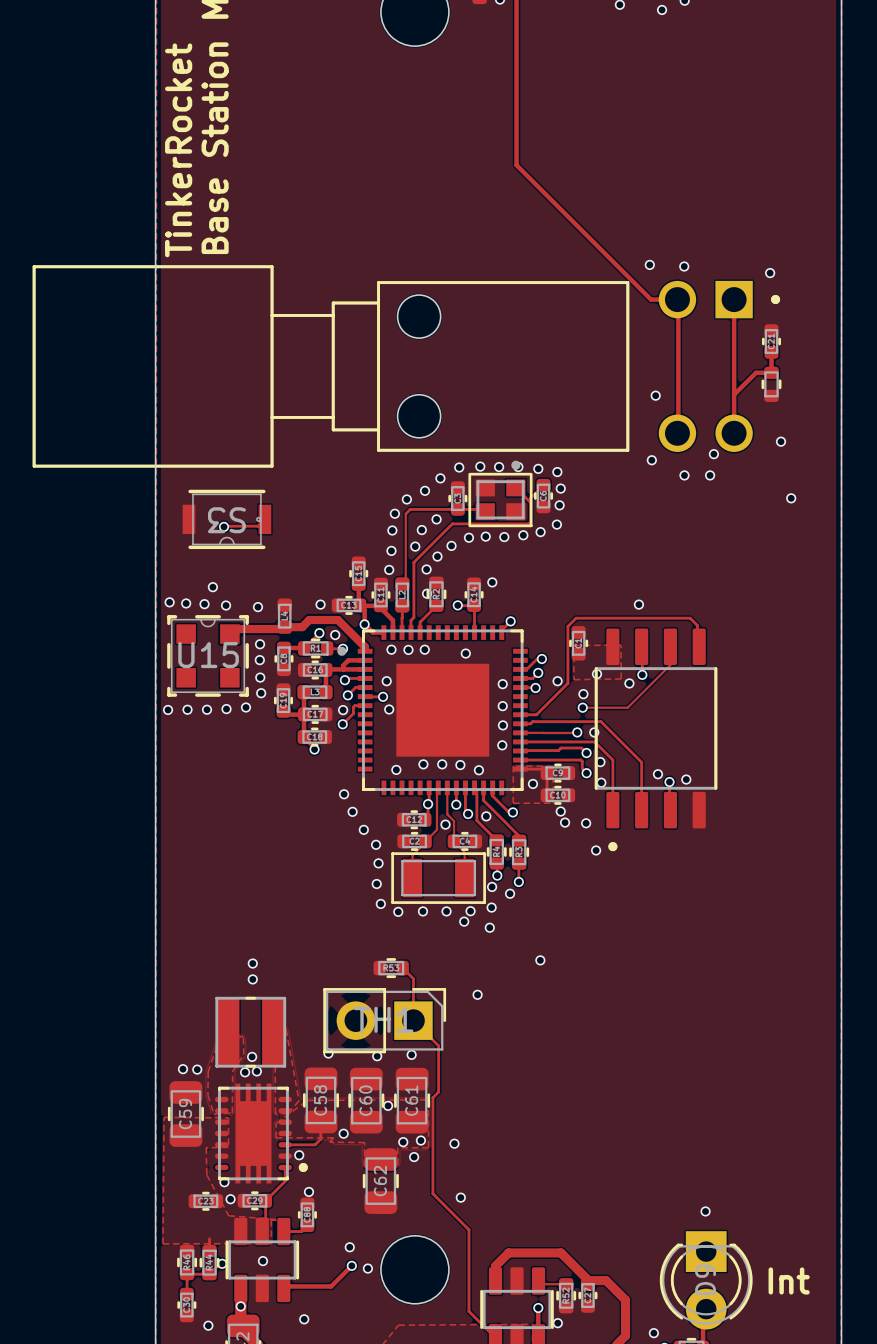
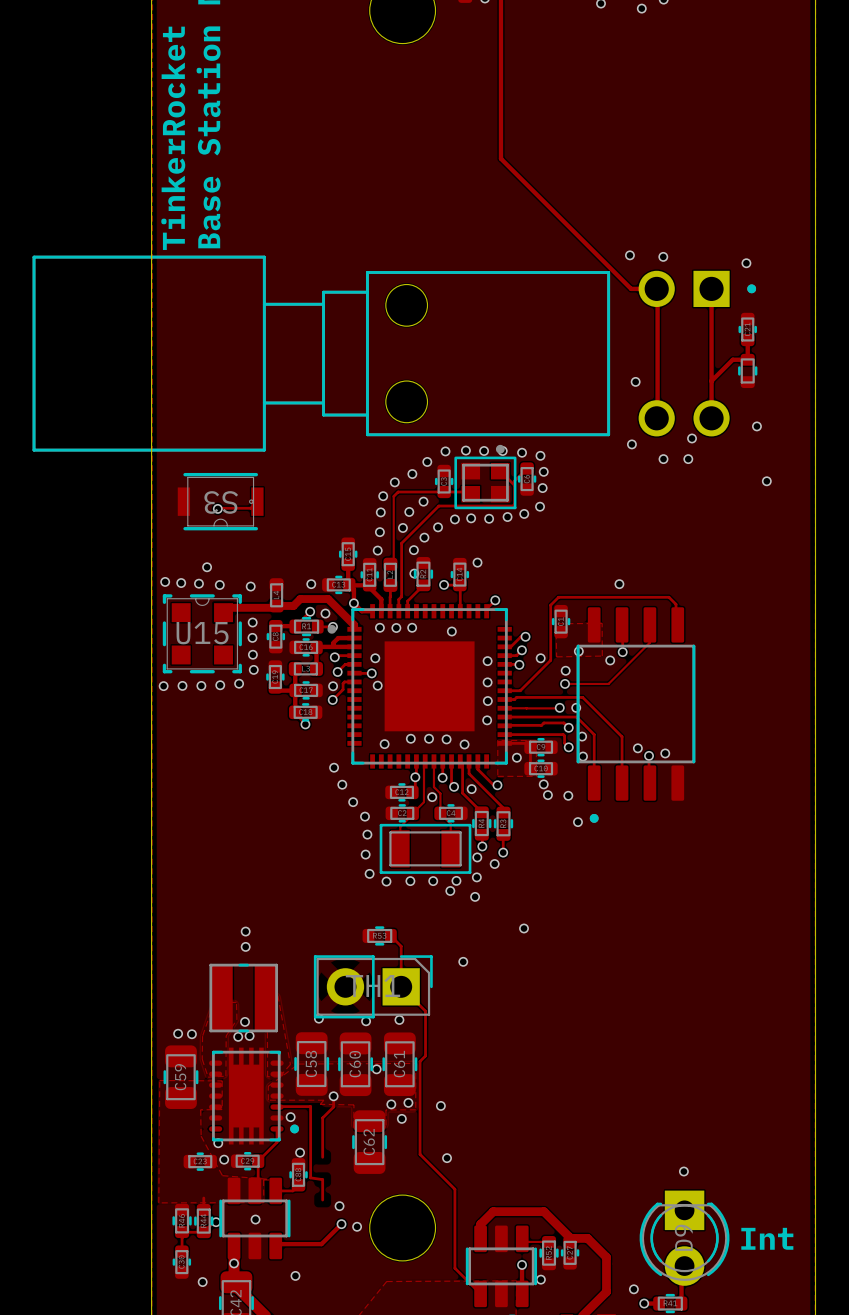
track: (320, 1122) (320, 1139) (315, 1144) (284, 1144) -> (322, 1200) (322, 1179) (310, 1177) (310, 1106) (277, 1106)
track: none -> (333, 1096) (333, 1107) (322, 1117) (322, 1157)

